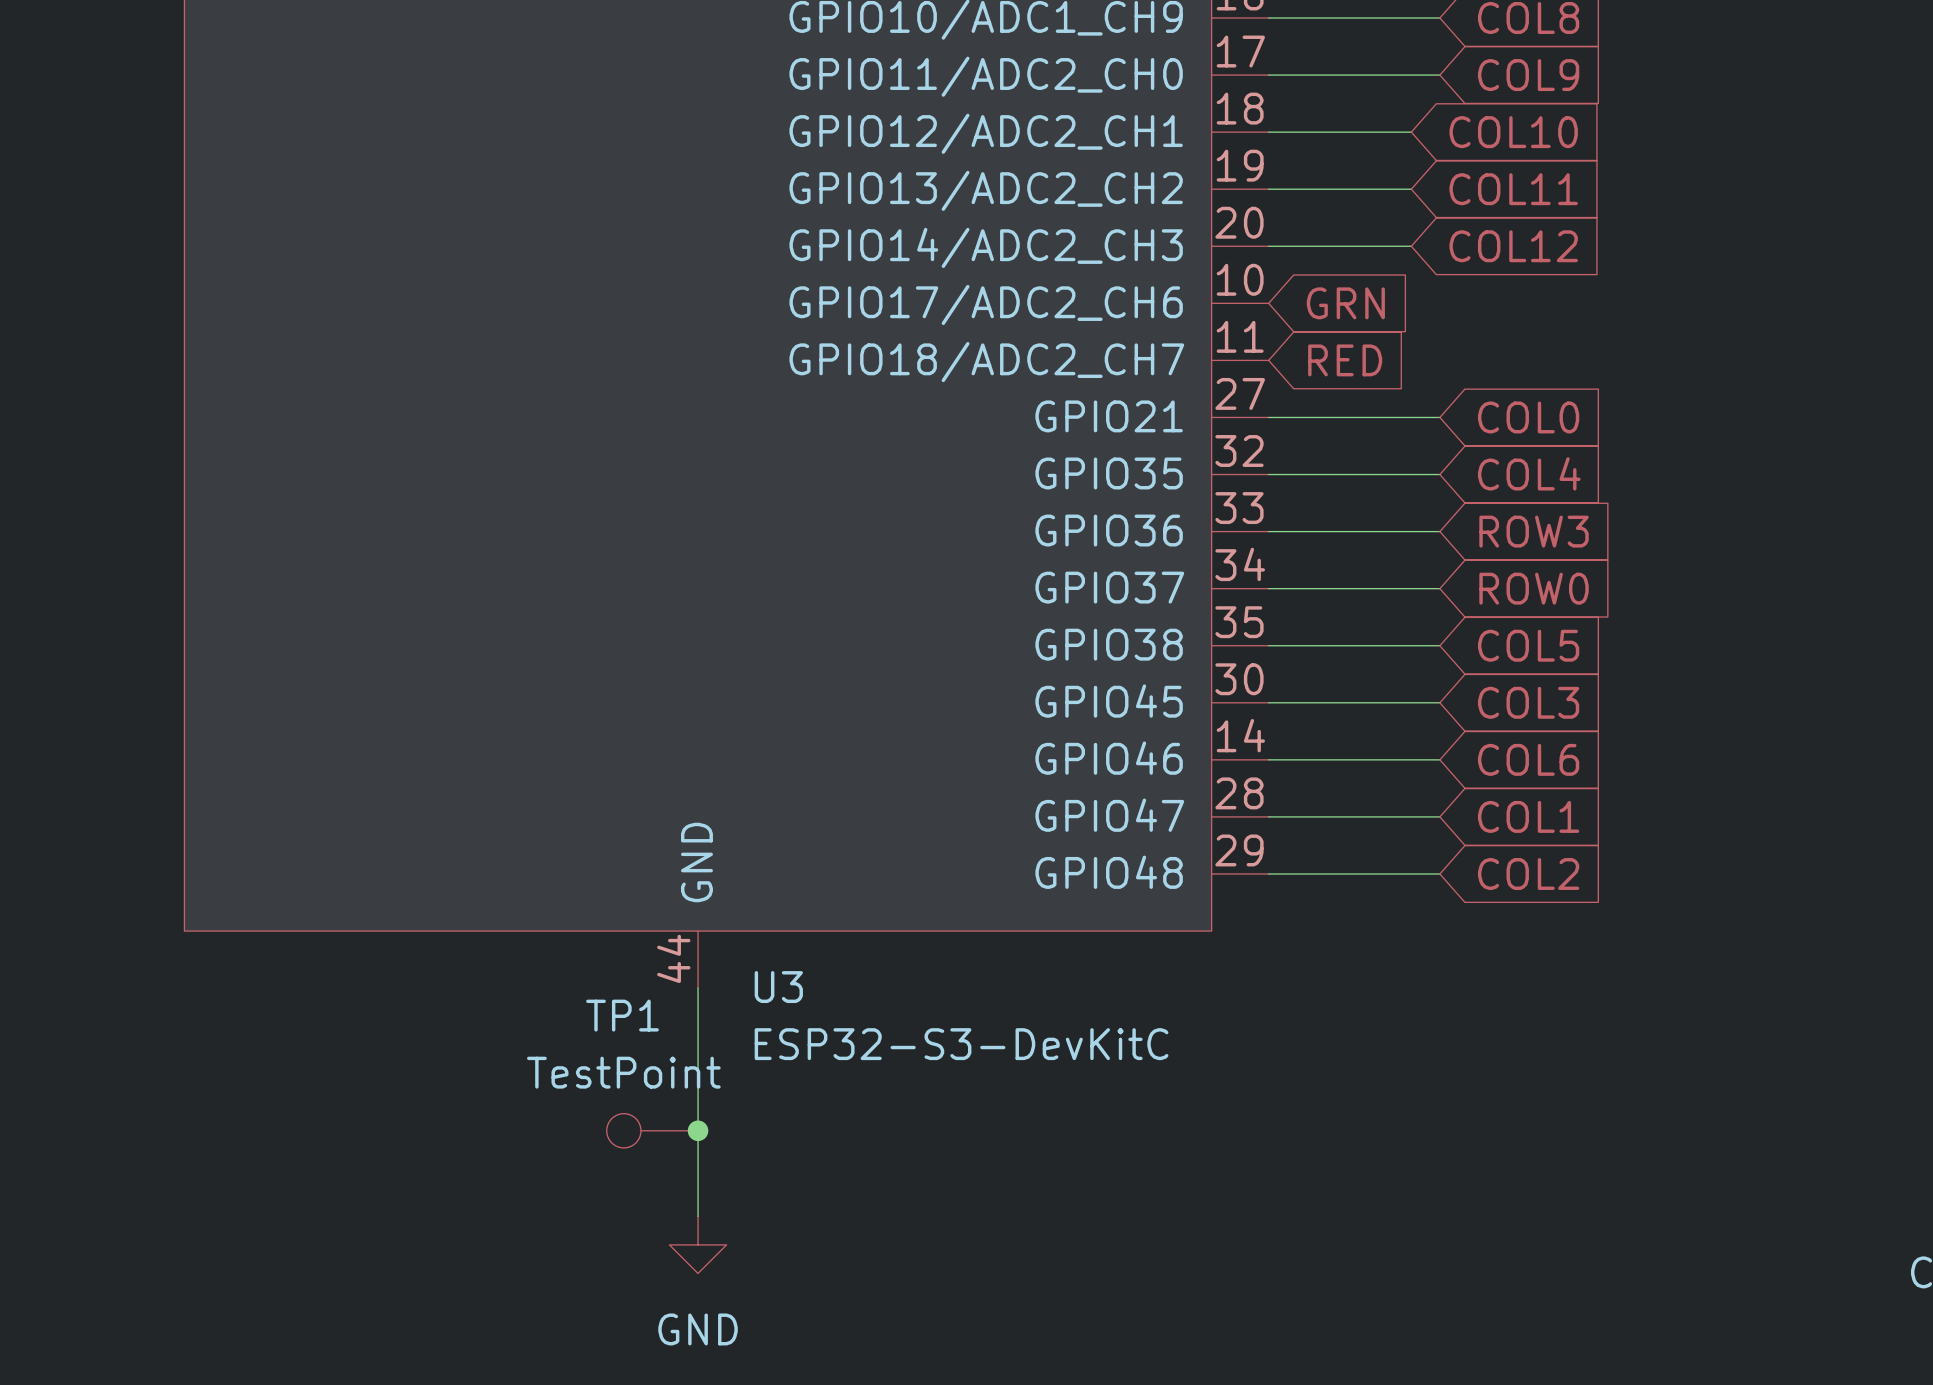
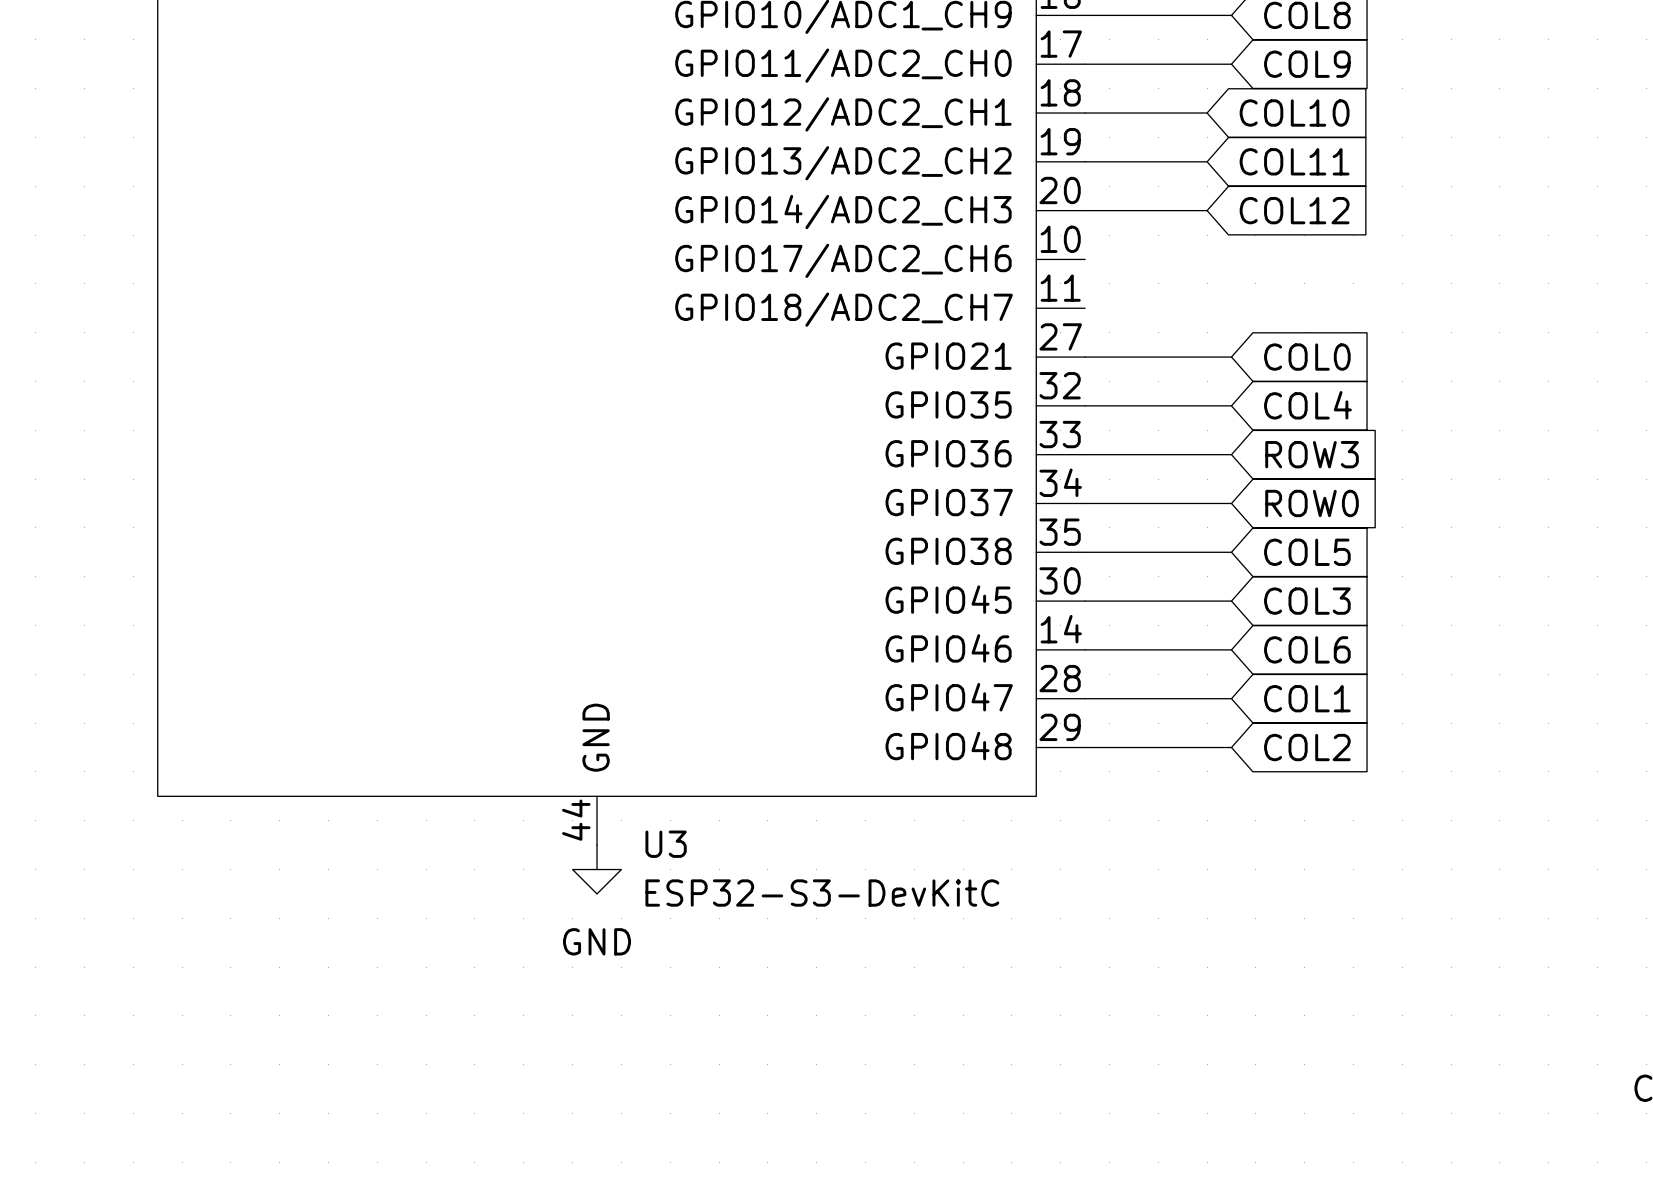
global label: GRN (1345, 303) -> none
global label: RED (1345, 360) -> none
wire: (698, 988) (698, 1216) -> none
TP1: TestPoint (652, 1130) -> none
junction: (698, 1130) -> none
power symbol position: GND (698, 1244) -> GND (597, 869)

